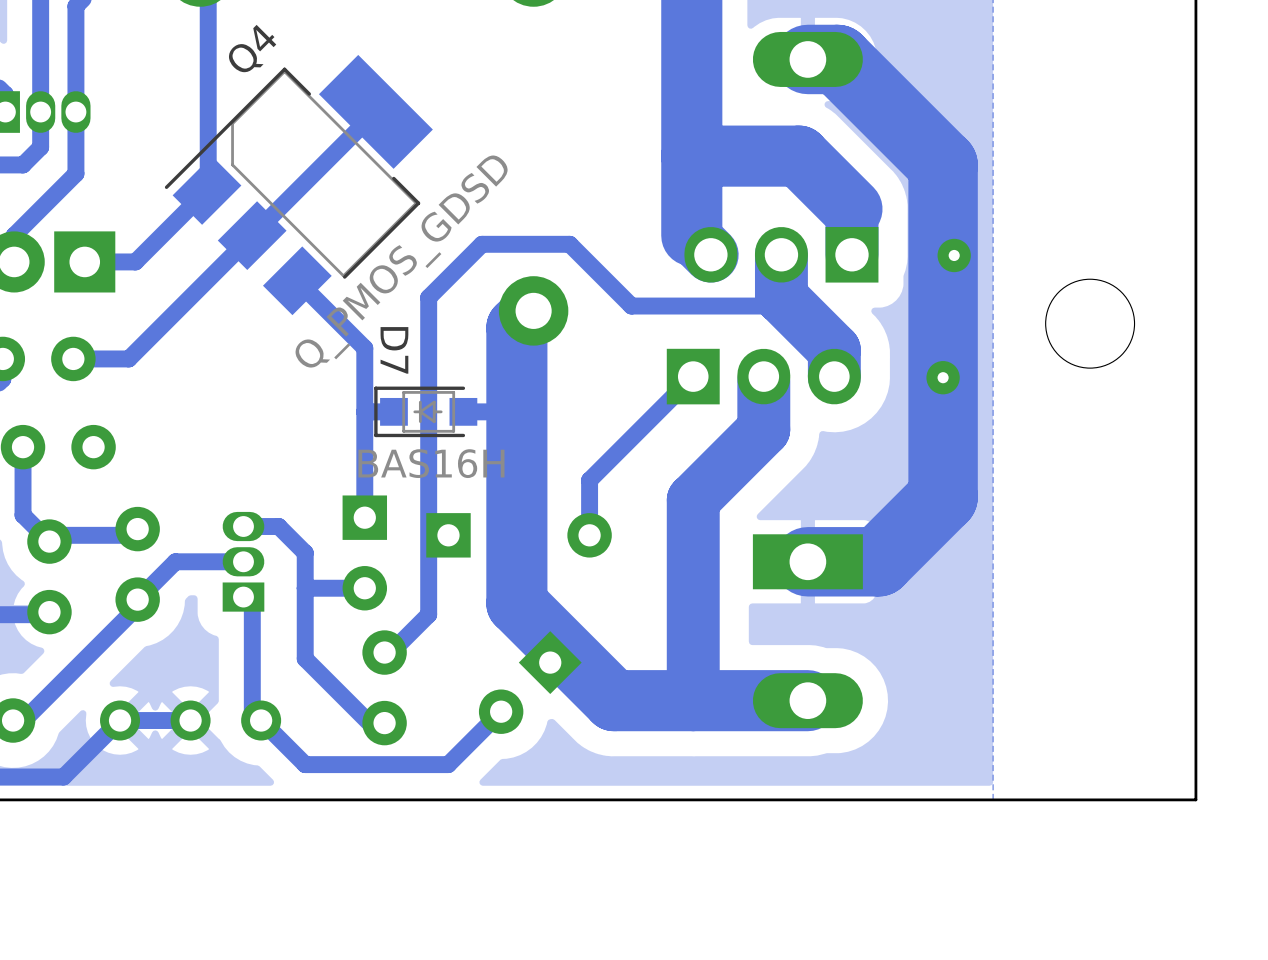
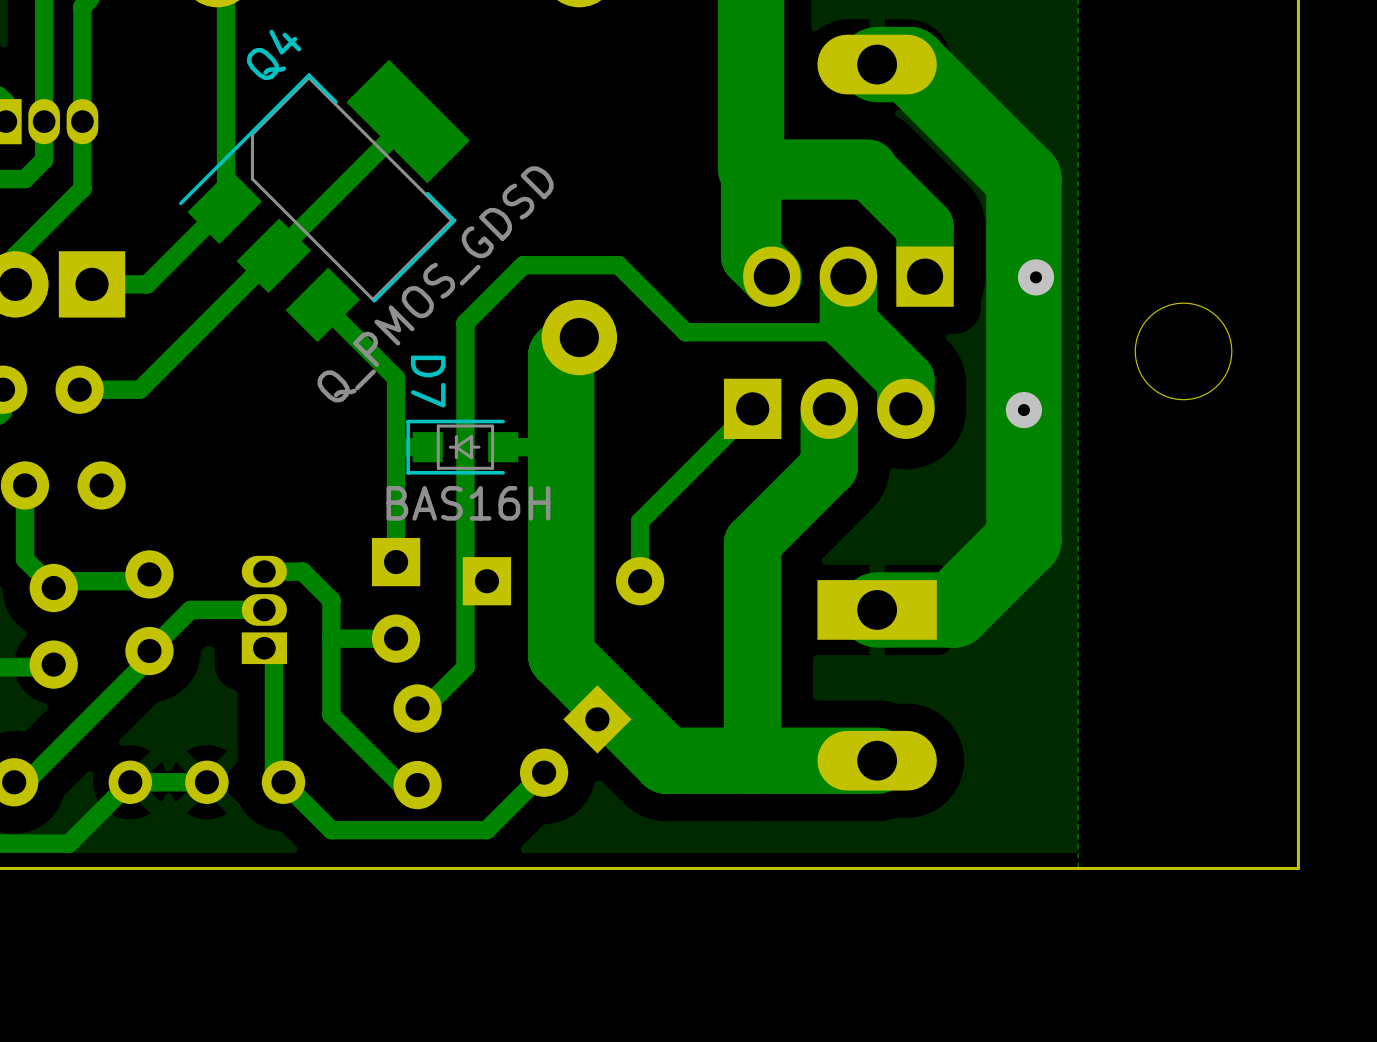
track width: thick (851, 209) (799, 156) (691, 156) (691, 235) -> thin (925, 226) (867, 169) (751, 169) (751, 255)

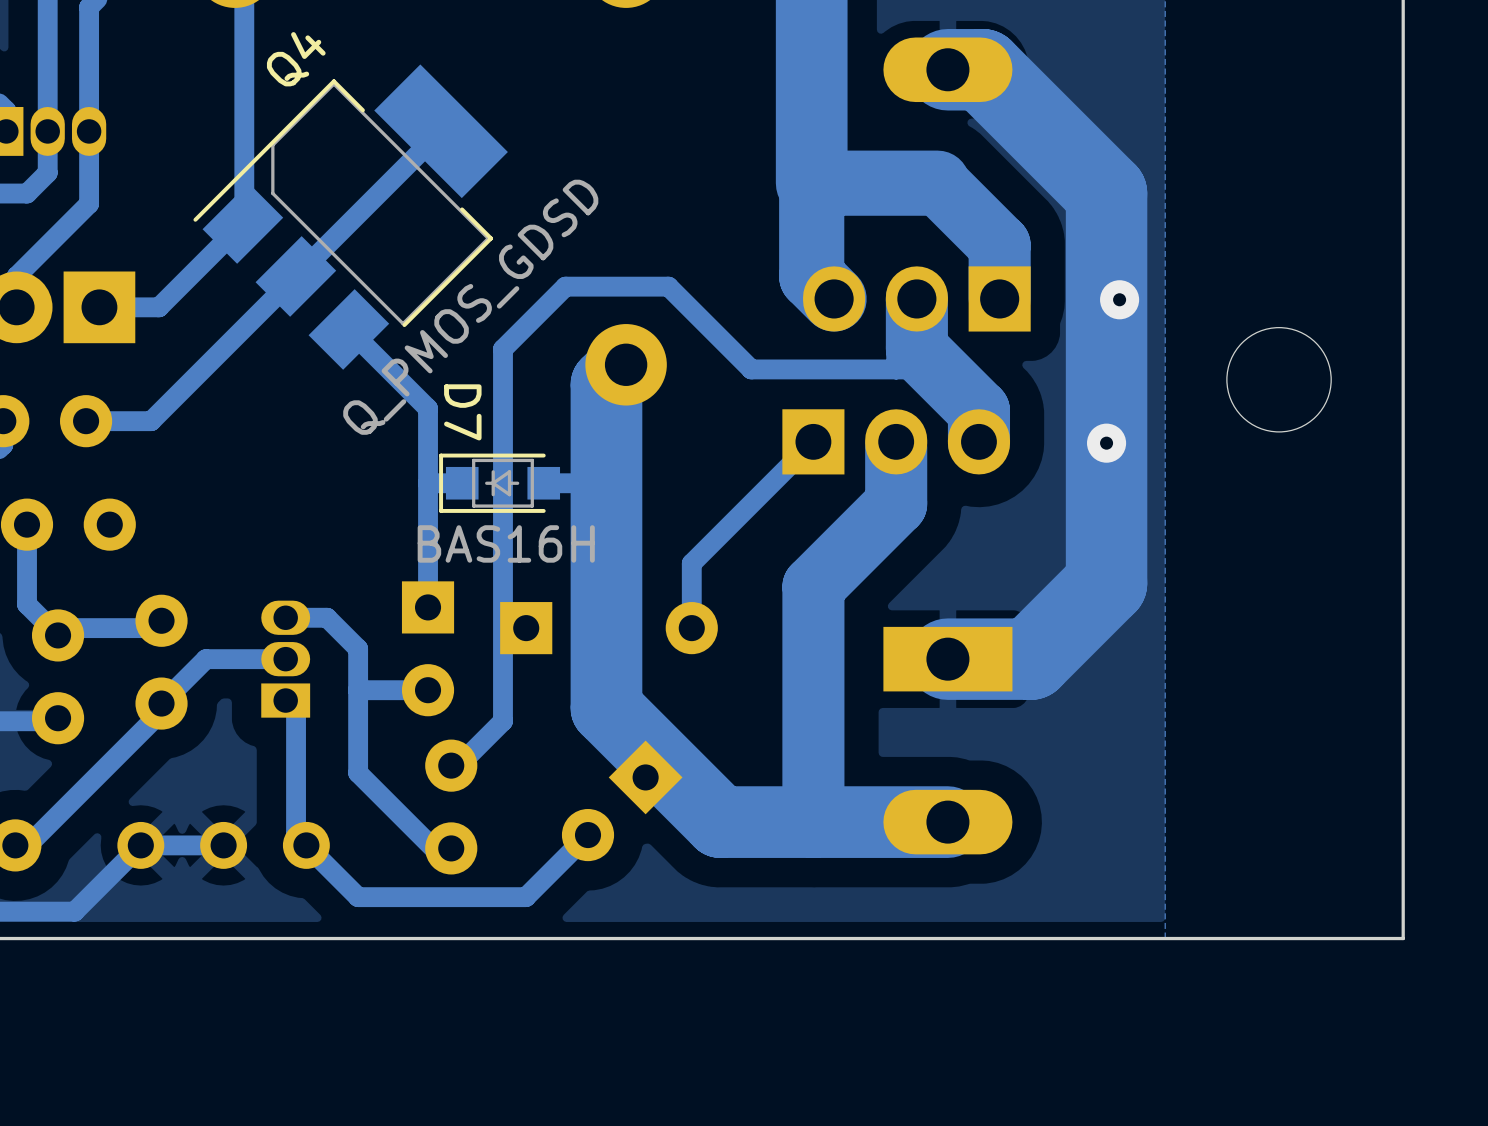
track: none -> (896, 319) (896, 369)
track: (833, 332) (685, 332) -> (958, 369) (751, 369) (740, 359)

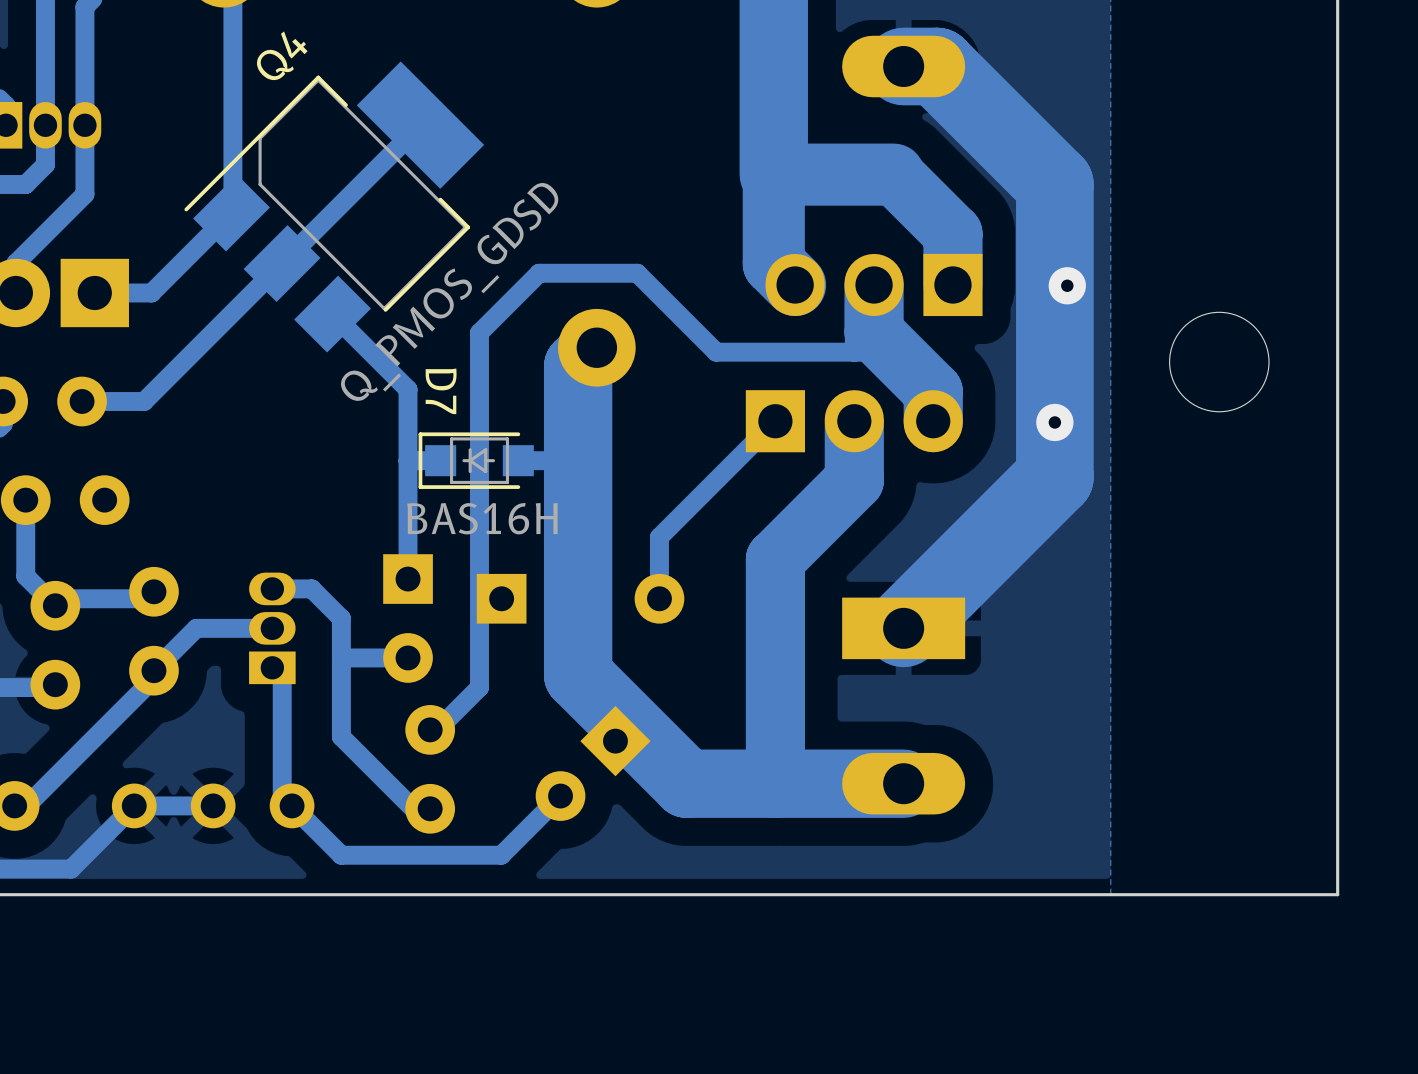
track: (1106, 500) (1106, 583) (1030, 659) (947, 659) -> (1054, 477) (903, 628)

